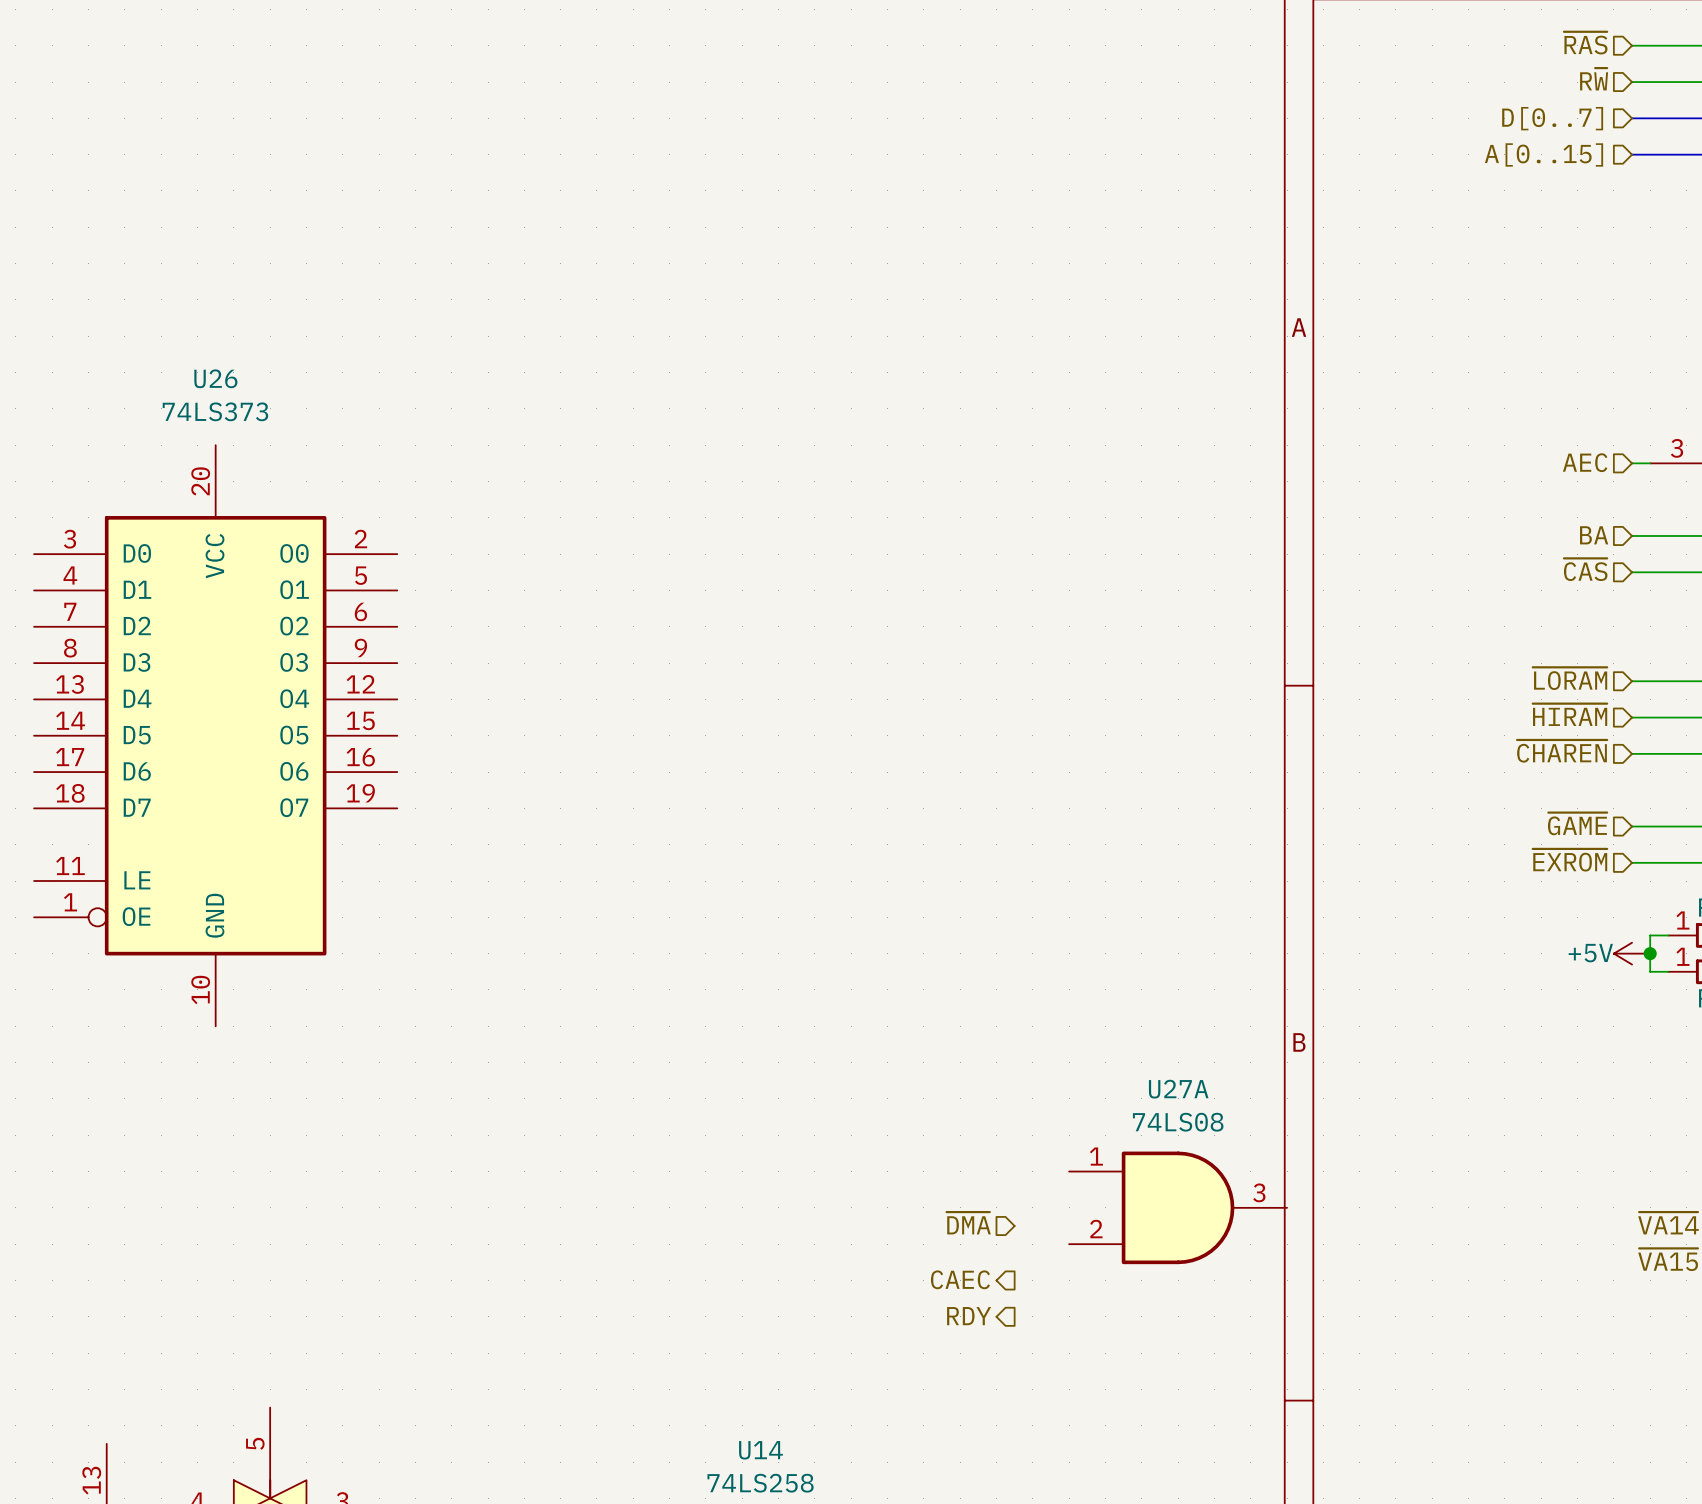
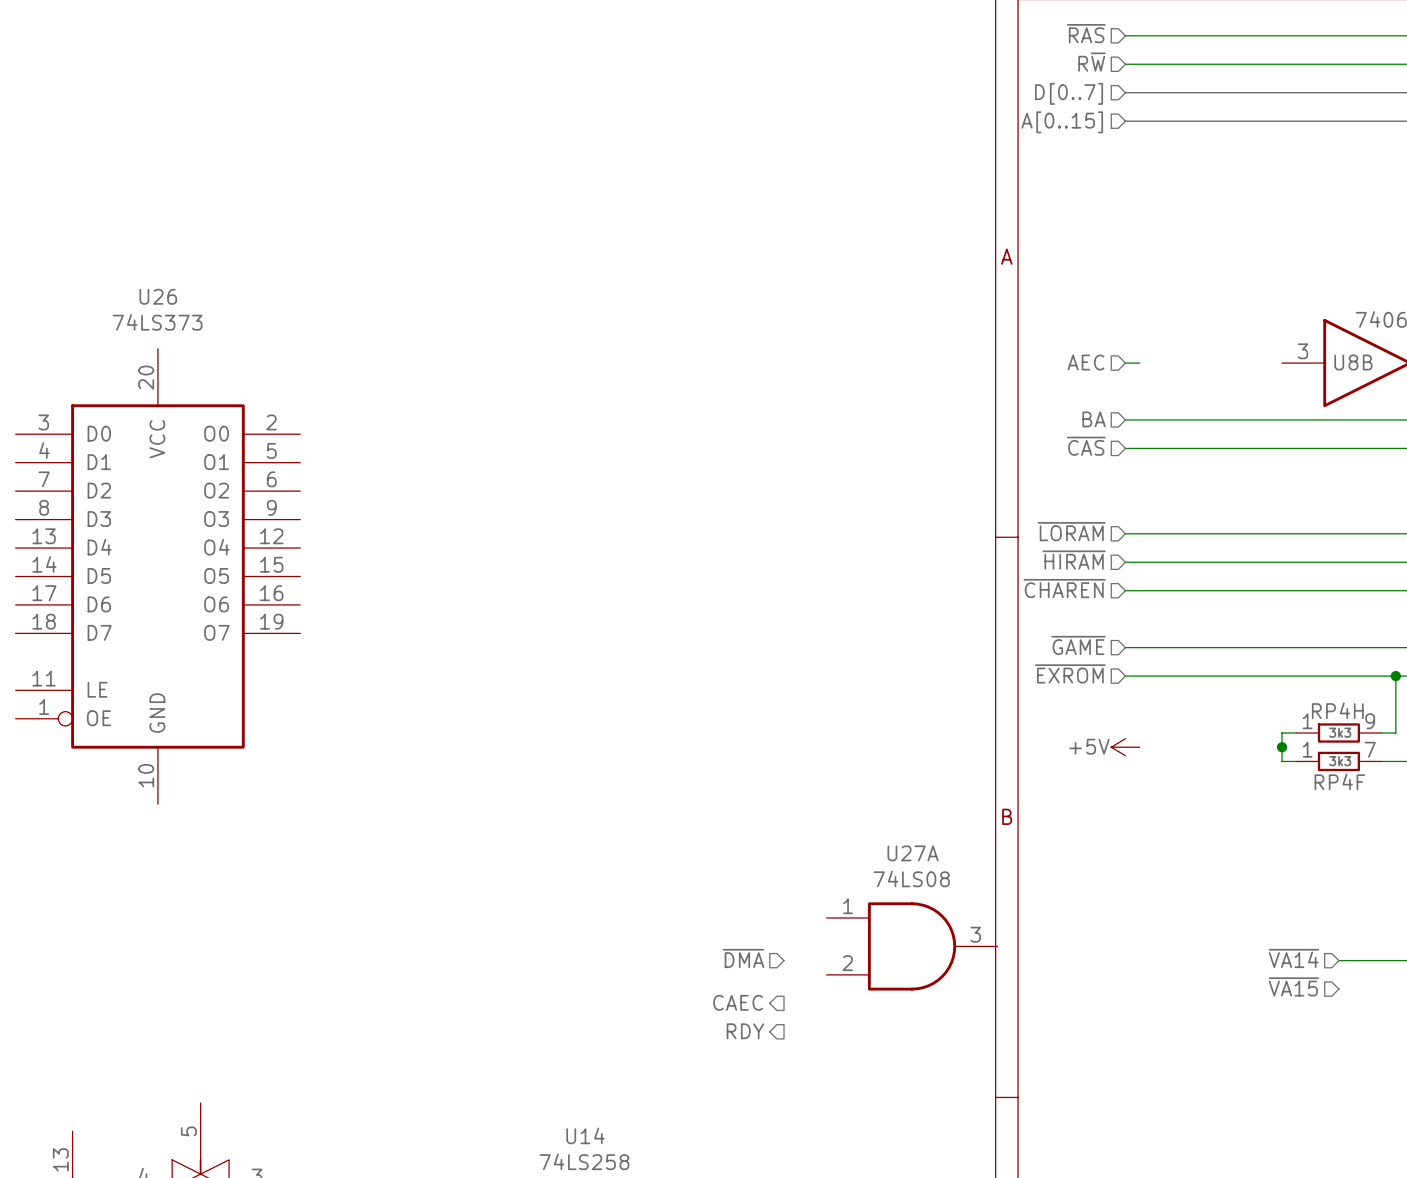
hierarchical label position: ~{RAS} (1585, 43) -> ~{RAS} (1086, 33)
wire: none -> (1125, 35) (1267, 35)
hierarchical label position: R~{W} (1594, 79) -> R~{W} (1092, 62)
wire: none -> (1125, 64) (1267, 64)
bus: none -> (1125, 92) (1267, 92)
hierarchical label position: D[0..7] (1552, 118) -> D[0..7] (1069, 93)
bus: none -> (1125, 121) (1267, 121)
hierarchical label position: A[0..15] (1544, 154) -> A[0..15] (1062, 122)
hierarchical label position: AEC (1585, 462) -> AEC (1085, 362)
wire: (1632, 463) (1650, 463) -> (1125, 363) (1139, 363)
wire: none -> (1125, 419) (1267, 419)
hierarchical label position: BA (1594, 535) -> BA (1094, 419)
hierarchical label position: ~{CAS} (1585, 569) -> ~{CAS} (1086, 446)
wire: none -> (1125, 448) (1267, 448)
hierarchical label position: ~{LORAM} (1569, 678) -> ~{LORAM} (1071, 531)
wire: none -> (1125, 533) (1267, 533)
hierarchical label position: ~{HIRAM} (1569, 714) -> ~{HIRAM} (1074, 560)
wire: none -> (1125, 562) (1267, 562)
hierarchical label position: ~{CHAREN} (1562, 751) -> ~{CHAREN} (1064, 588)
wire: none -> (1125, 590) (1267, 590)
hierarchical label position: ~{GAME} (1577, 823) -> ~{GAME} (1078, 645)
wire: none -> (1125, 647) (1267, 647)
hierarchical label position: ~{EXROM} (1569, 860) -> ~{EXROM} (1070, 673)
wire: none -> (1125, 676) (1267, 676)
power symbol position: +5V (1632, 953) -> +5V (1125, 747)

